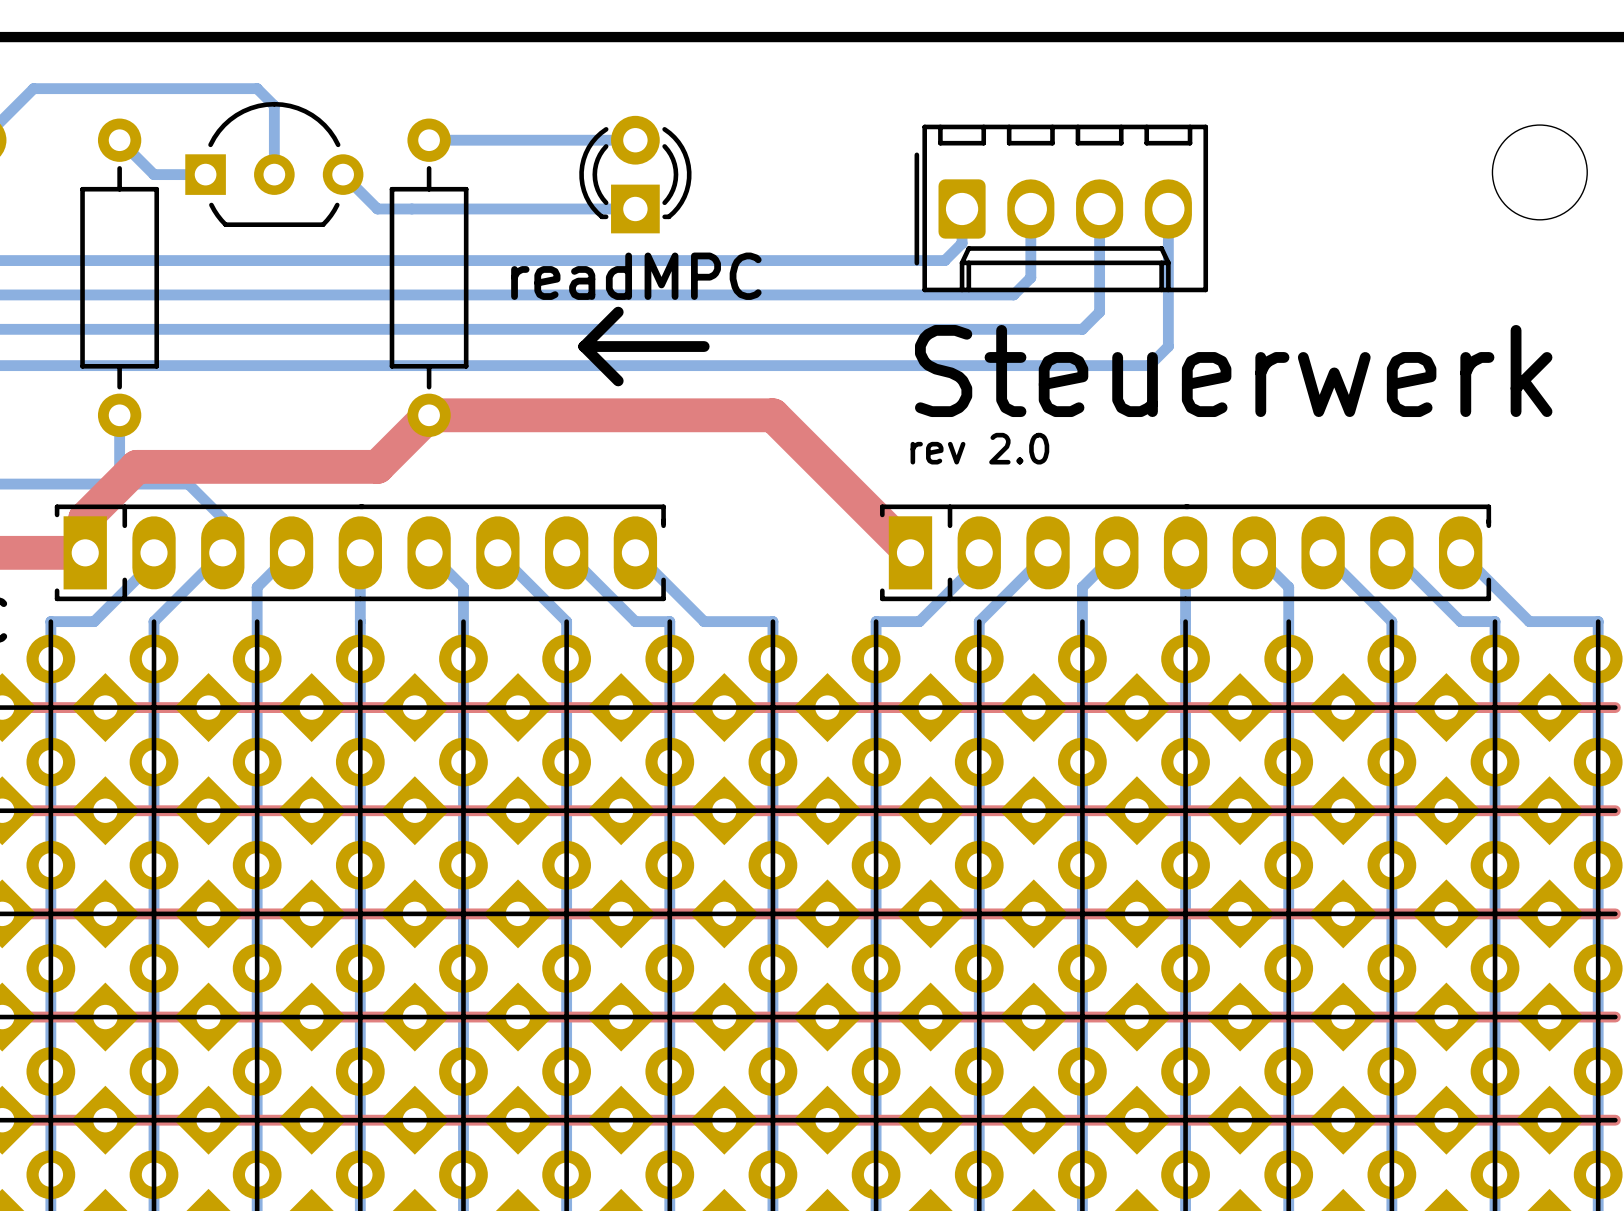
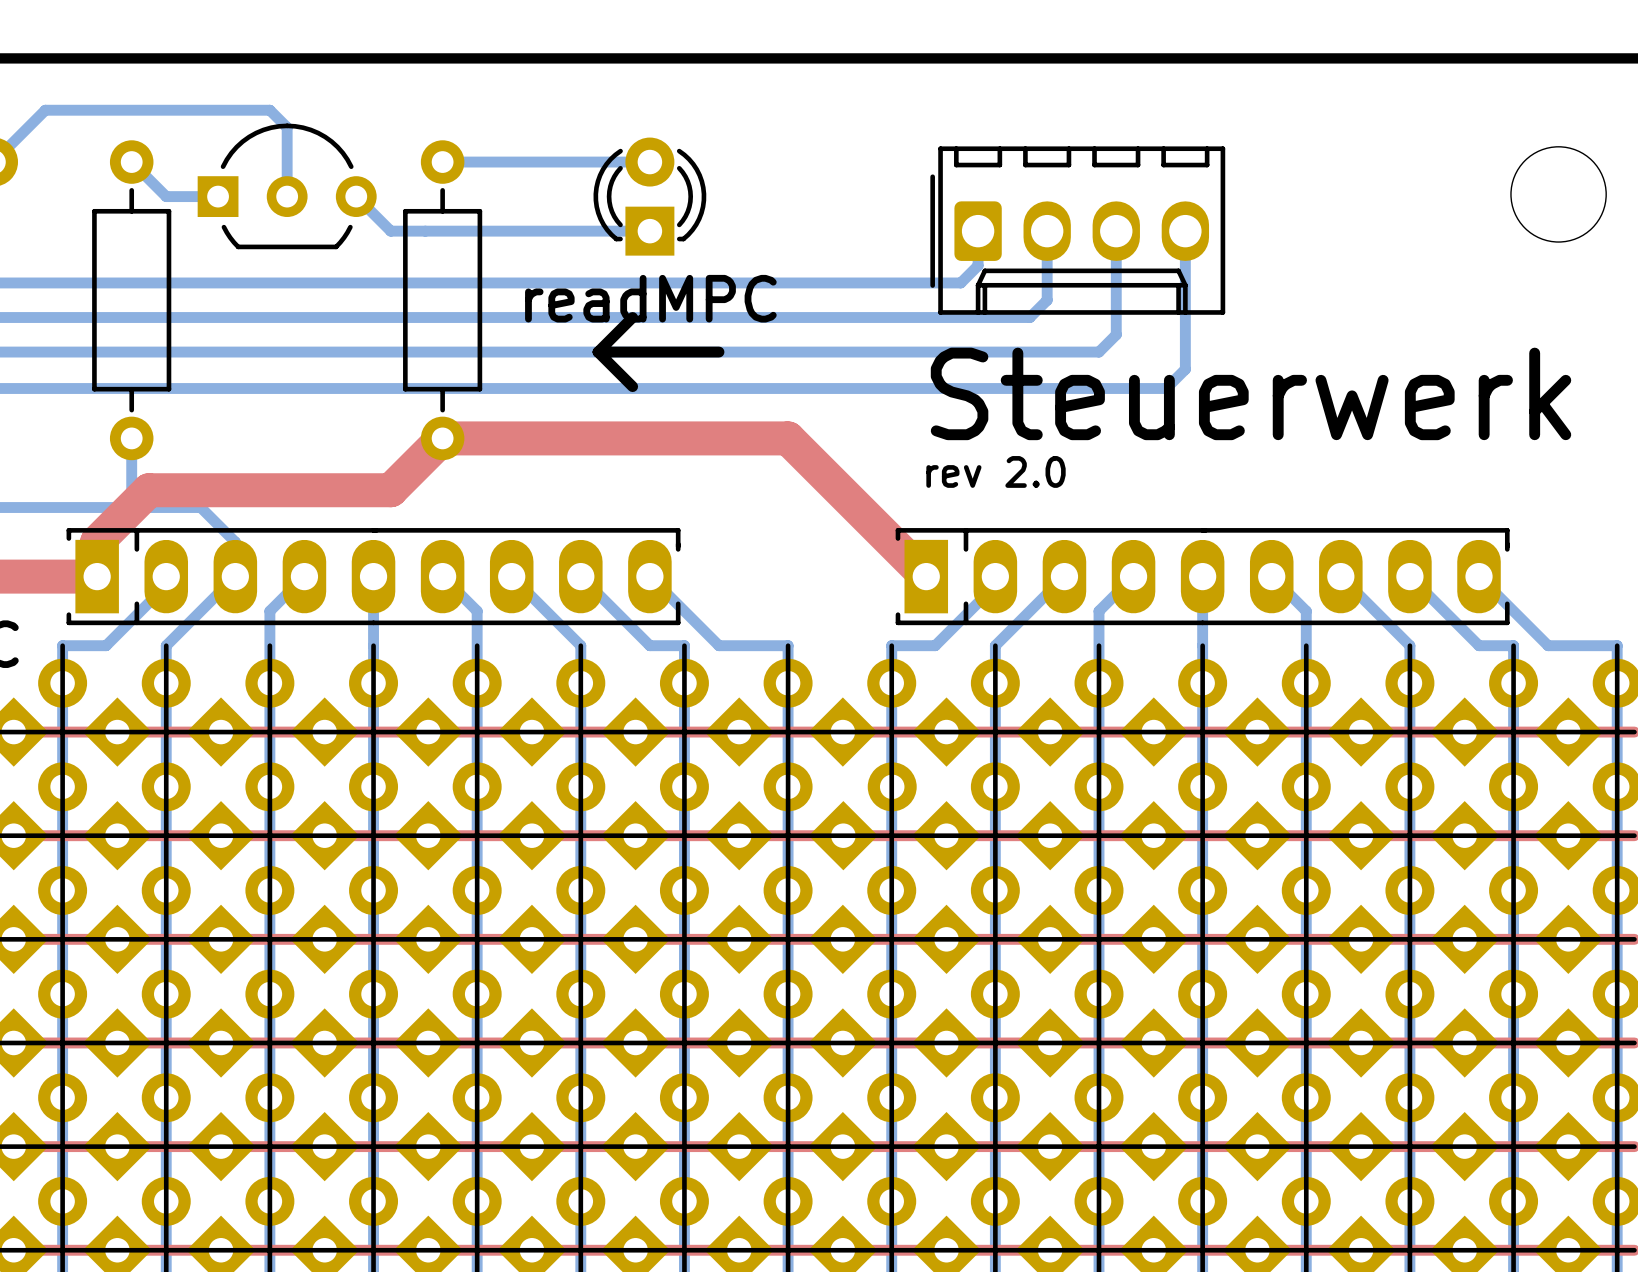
line: (618, 312) (583, 346) -> (632, 317) (598, 352)
line: (583, 346) (704, 346) -> (598, 352) (718, 352)
line: (583, 346) (618, 380) -> (598, 352) (632, 386)

